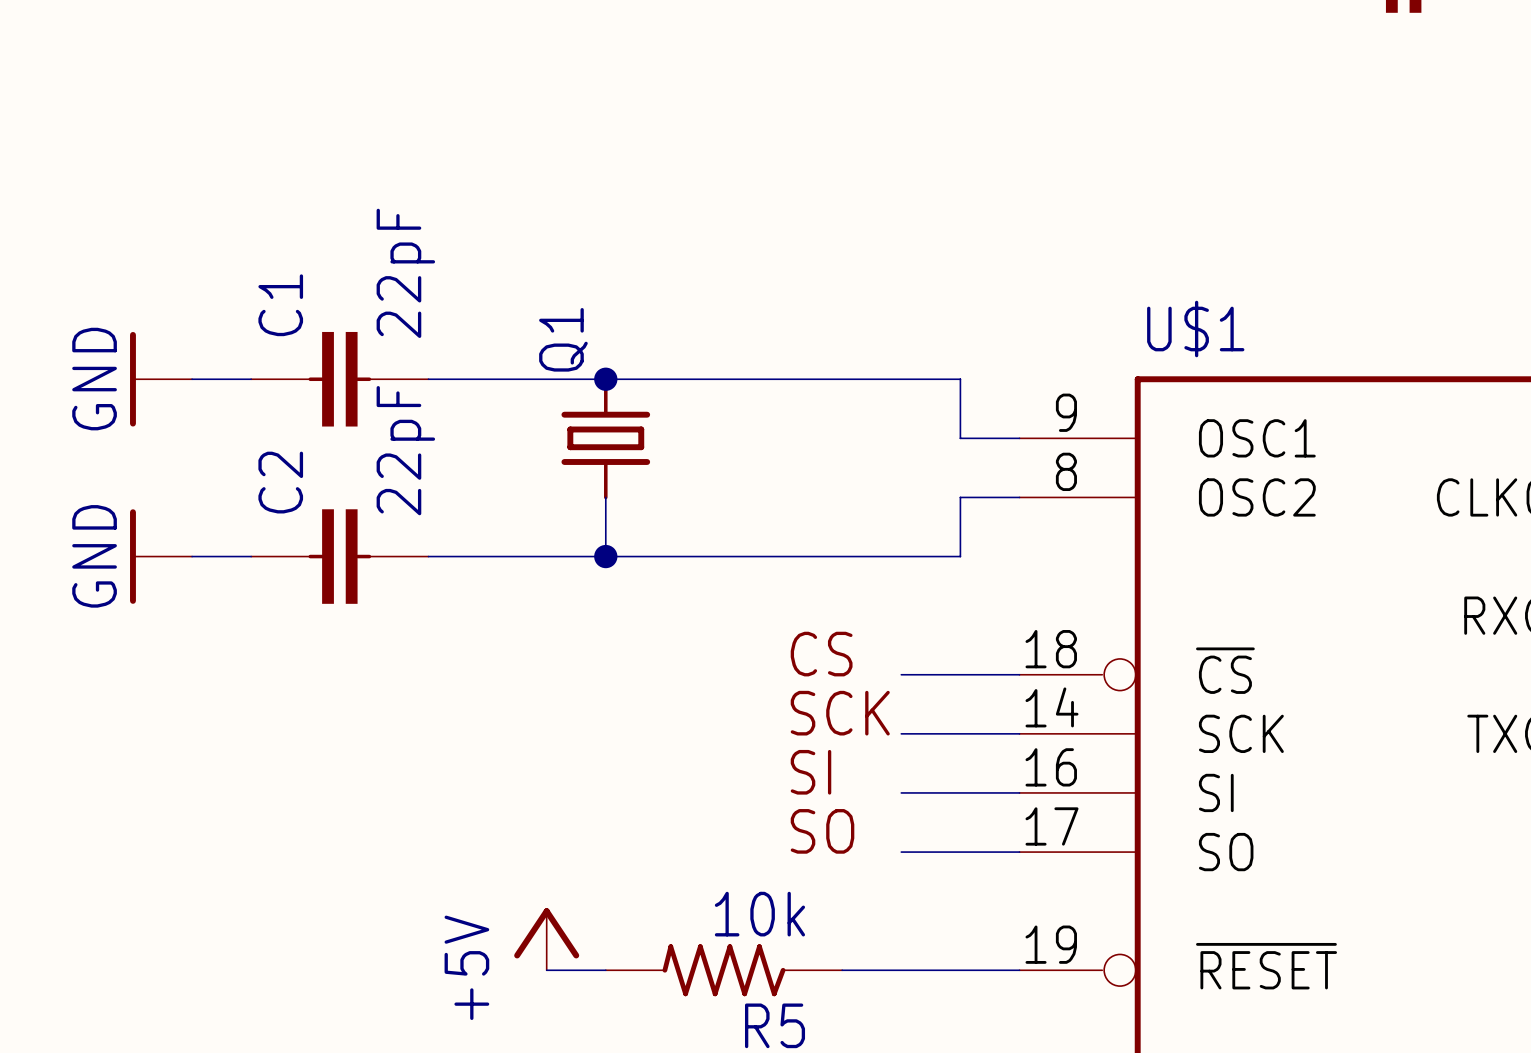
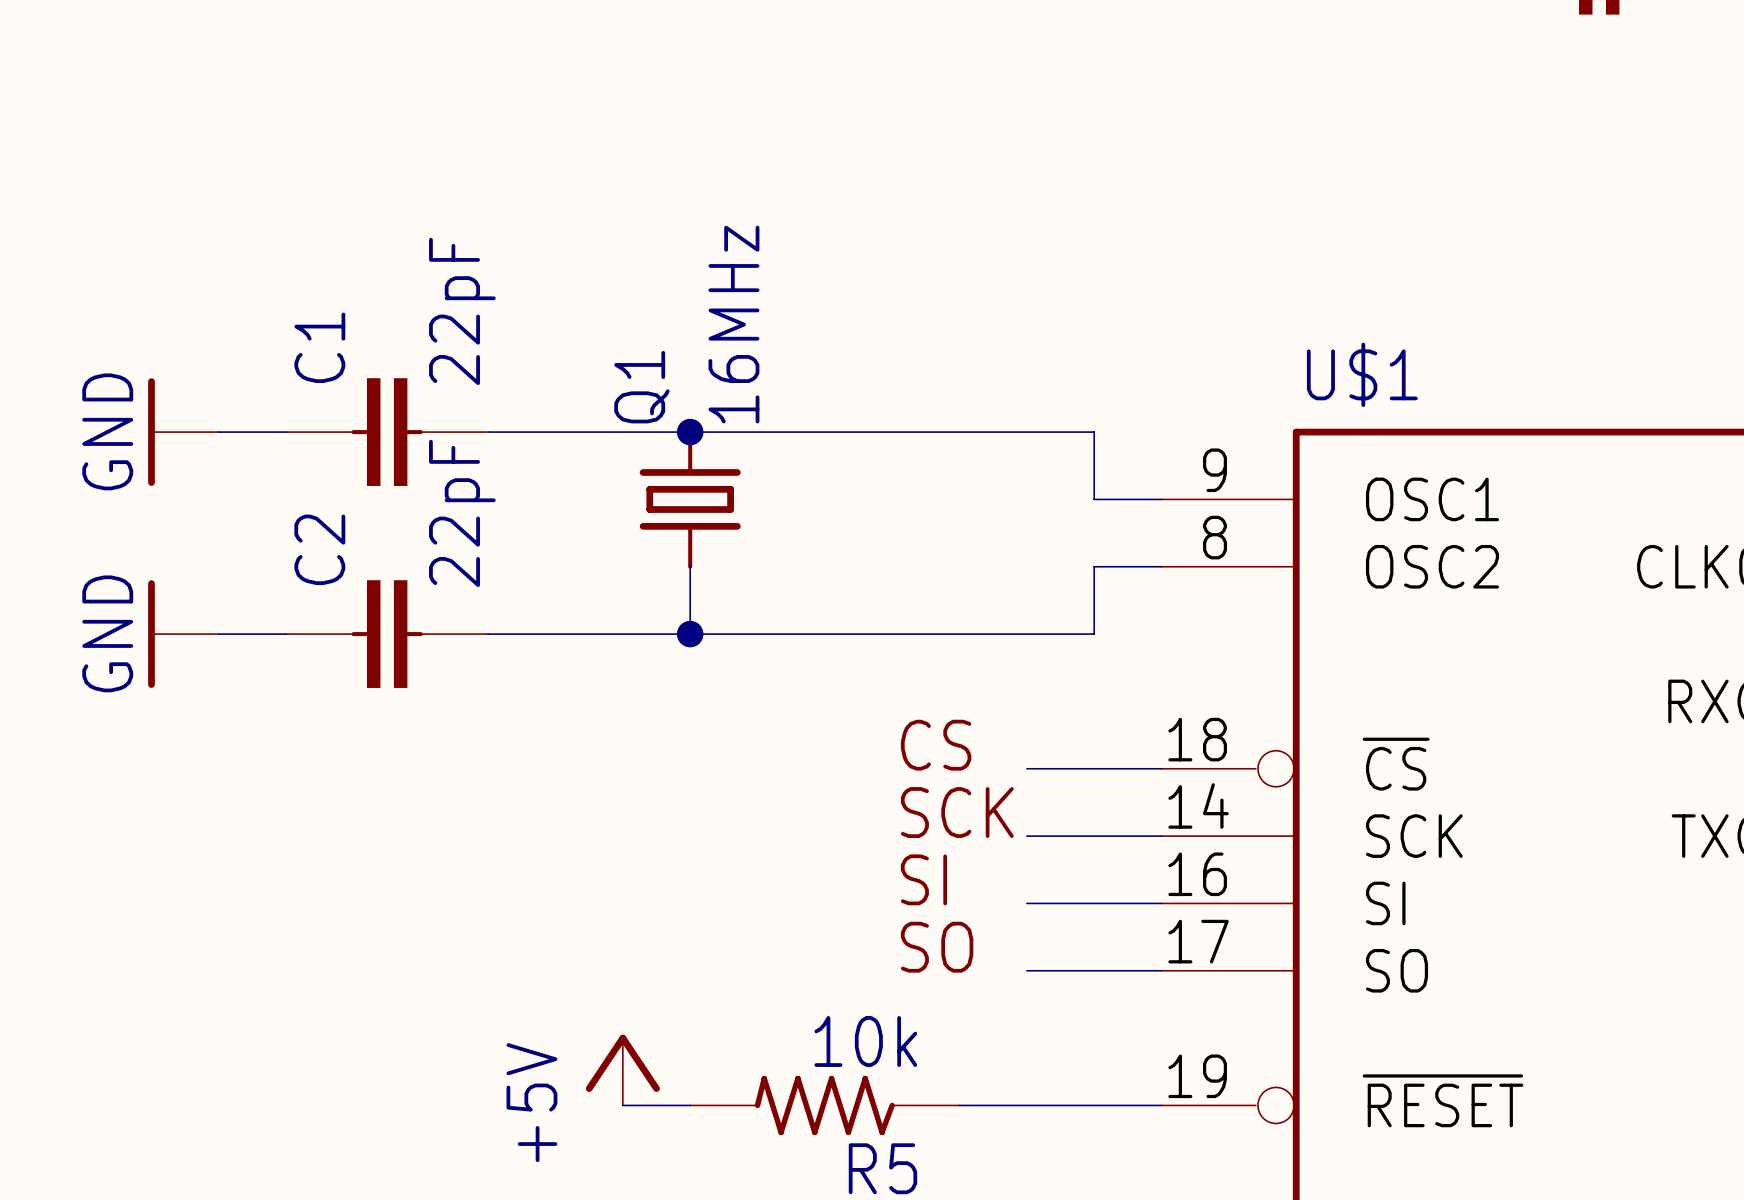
Q1 value: none -> 16MHz (733, 324)

